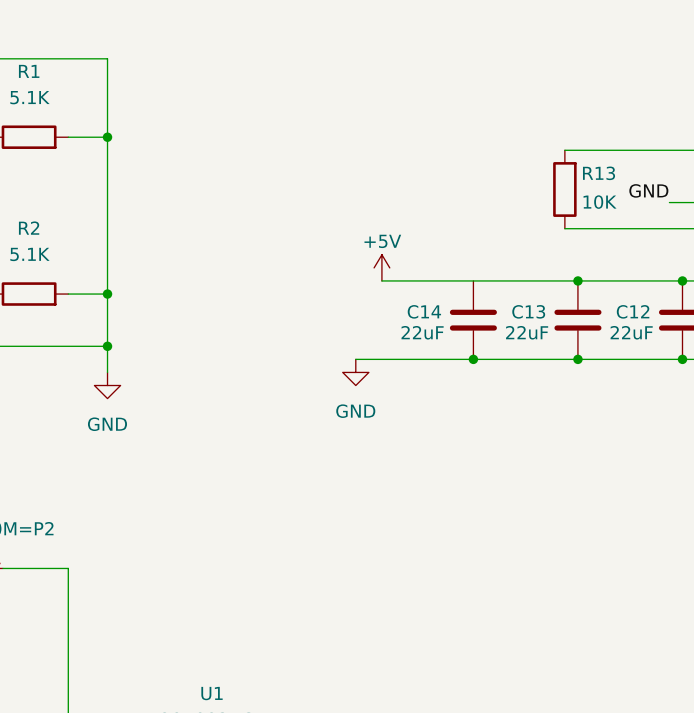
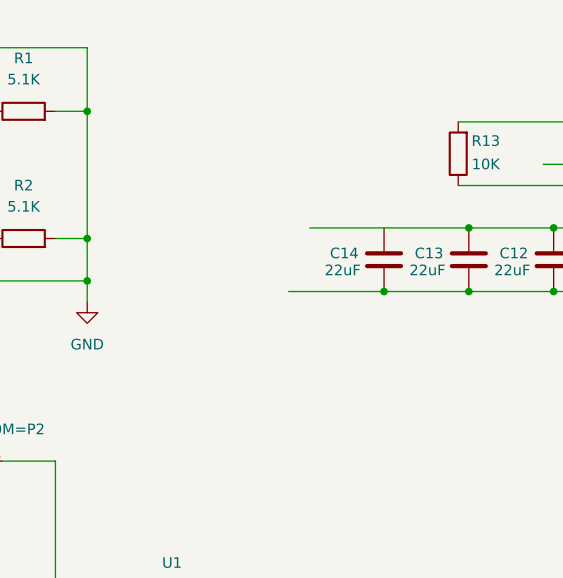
label: GND (648, 190) -> none
power symbol: +5V (381, 267) -> none
power symbol: GND (355, 372) -> none

